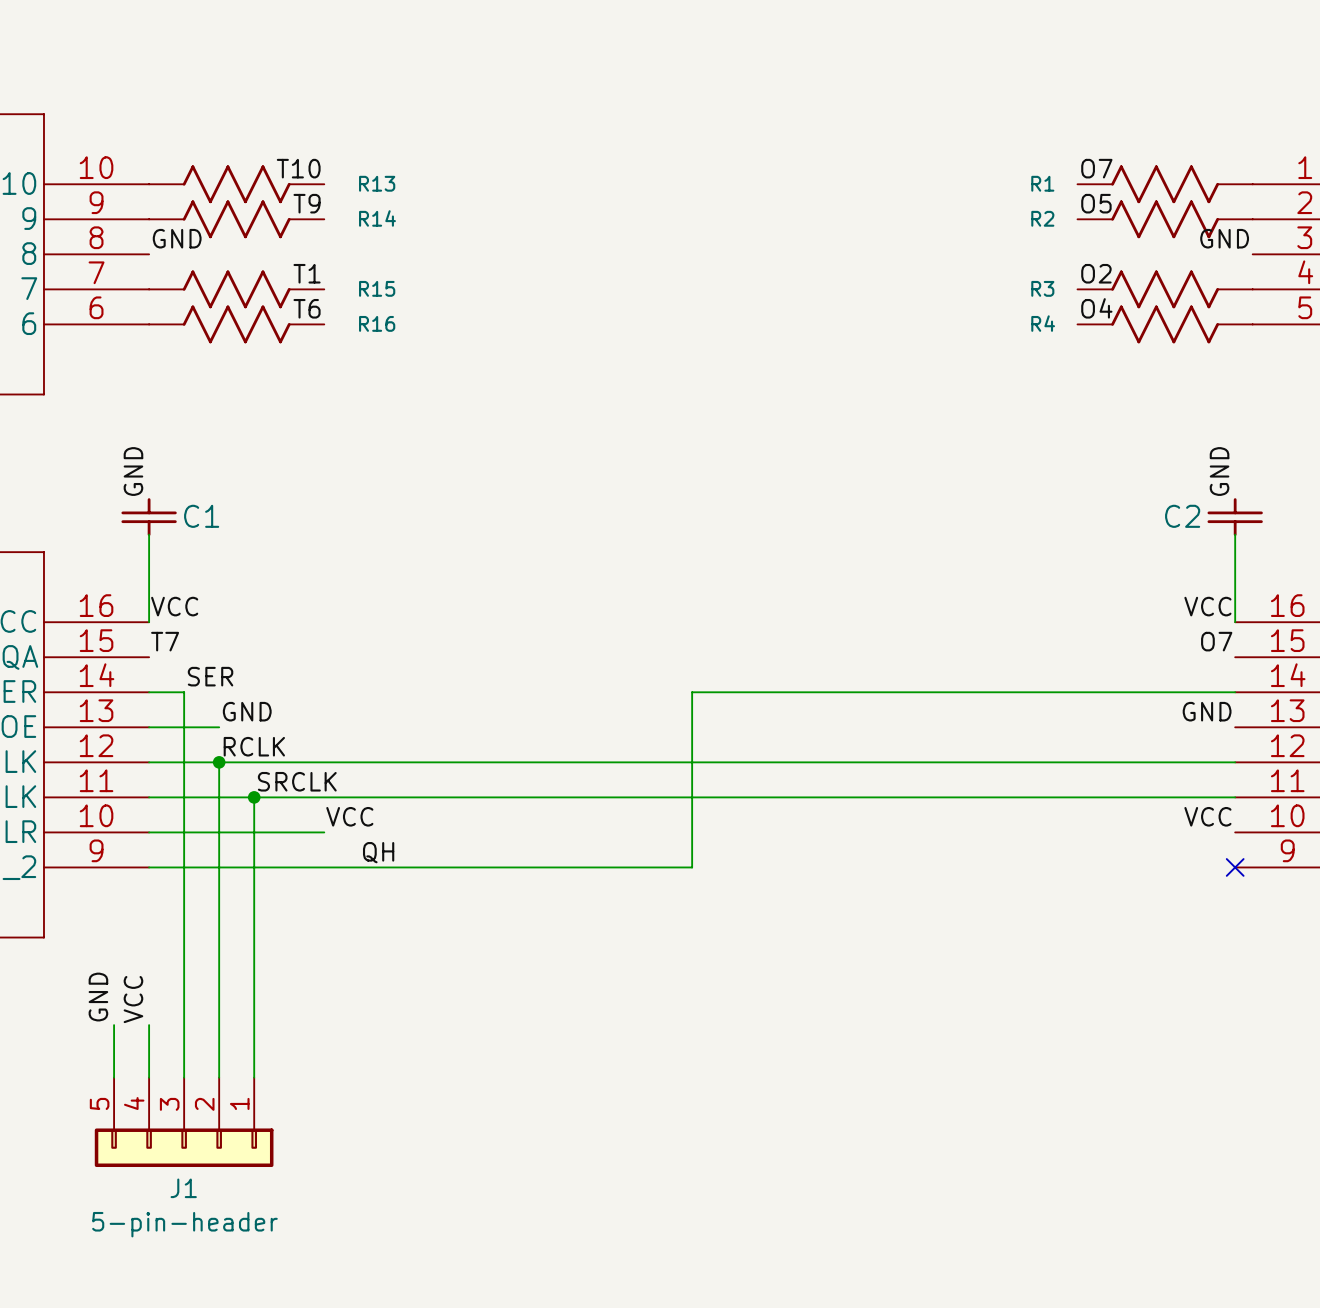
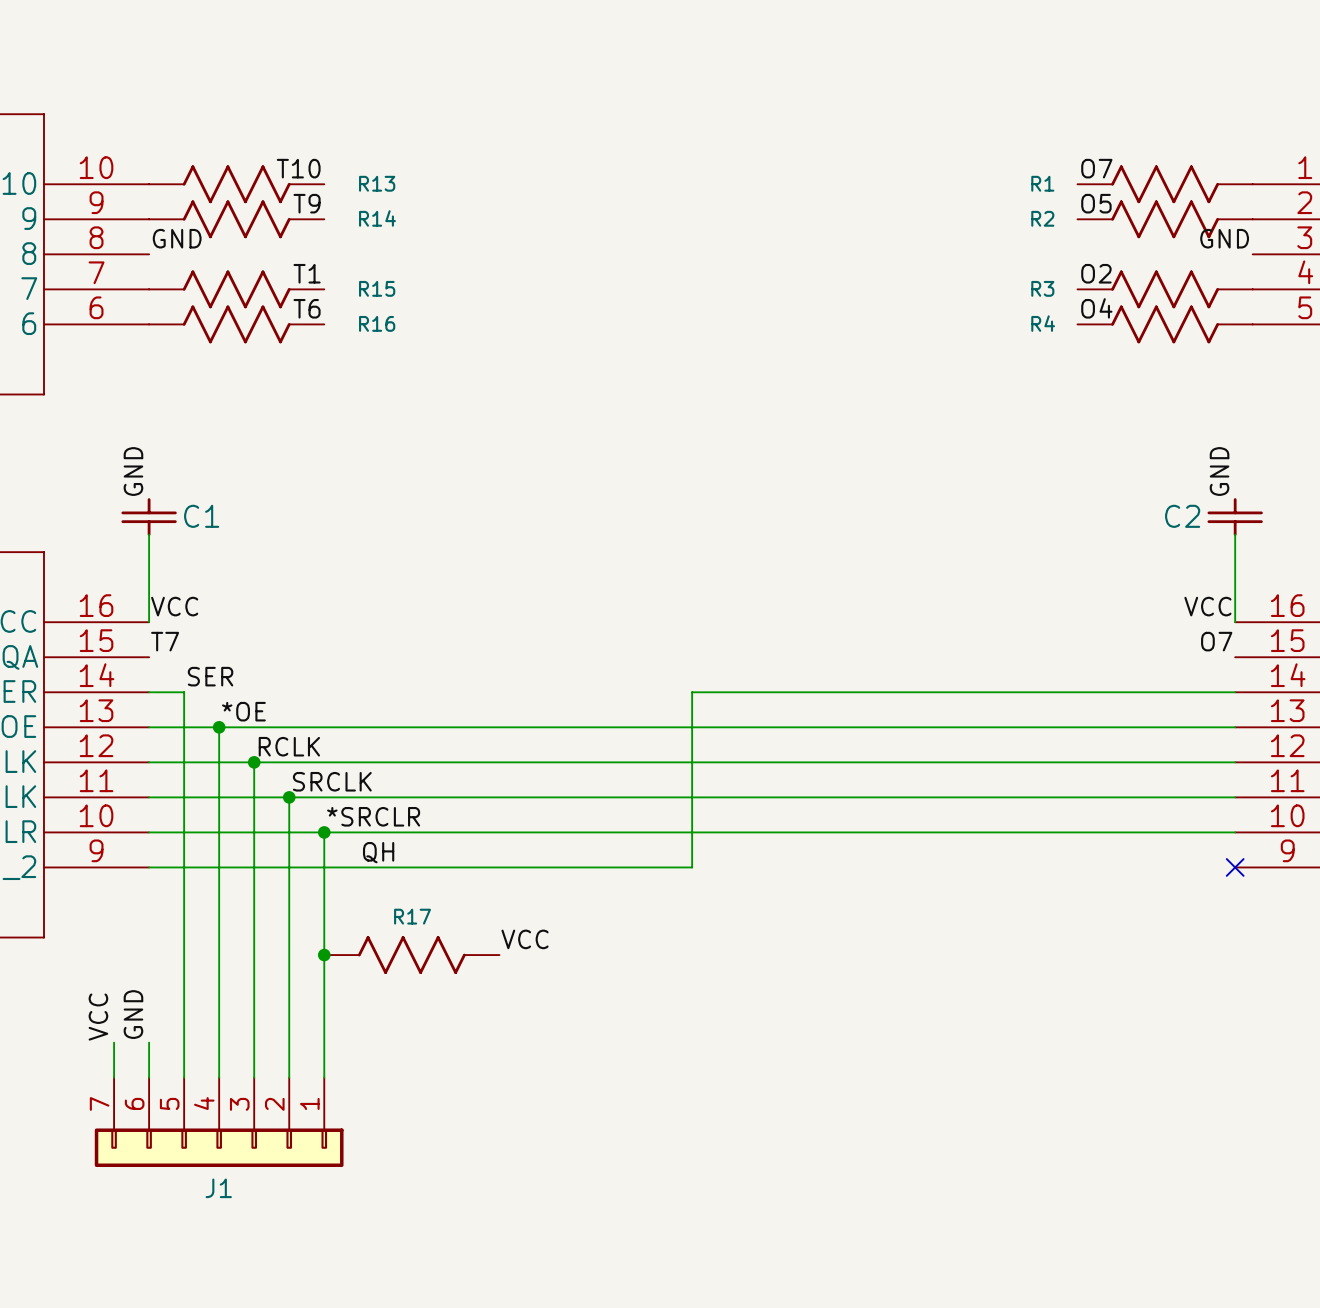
label: GND (247, 711) -> *OE (243, 711)
label: GND (1207, 711) -> none
junction: none -> (219, 727)
wire: none -> (1235, 727) (219, 727) (219, 762)
label position: RCLK (254, 746) -> RCLK (289, 746)
junction: (219, 762) -> none
wire: none -> (254, 762) (254, 797)
junction: none -> (254, 762)
label position: SRCLK (297, 781) -> SRCLK (332, 781)
junction: (254, 797) -> none
wire: none -> (289, 797) (289, 1077)
junction: none -> (289, 797)
label: VCC (349, 816) -> *SRCLR (373, 816)
label: VCC (1207, 816) -> none
junction: none -> (324, 832)
wire: none -> (1235, 832) (324, 832) (324, 1077)
label: none -> VCC (525, 939)
junction: none -> (324, 955)
R17: none -> (411, 955)
label position: GND (98, 997) -> GND (133, 1014)
label position: VCC (133, 999) -> VCC (98, 1017)
wire: (114, 1025) (114, 1042) -> none
wire: (149, 1025) (149, 1042) -> none
J1 symbol: [94, 1077, 274, 1168] -> [94, 1077, 344, 1168]
J1 value: 5-pin-header (184, 1224) -> none

